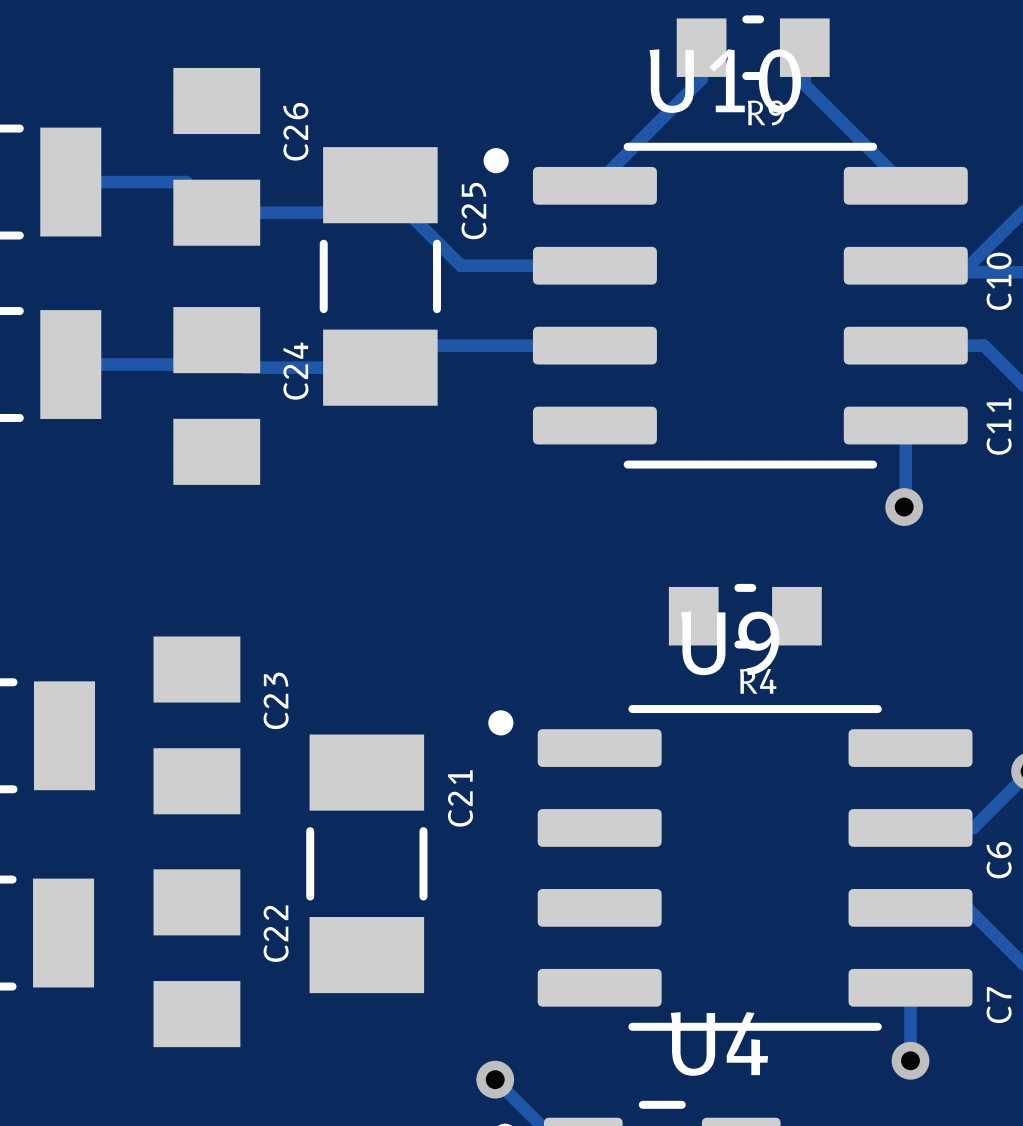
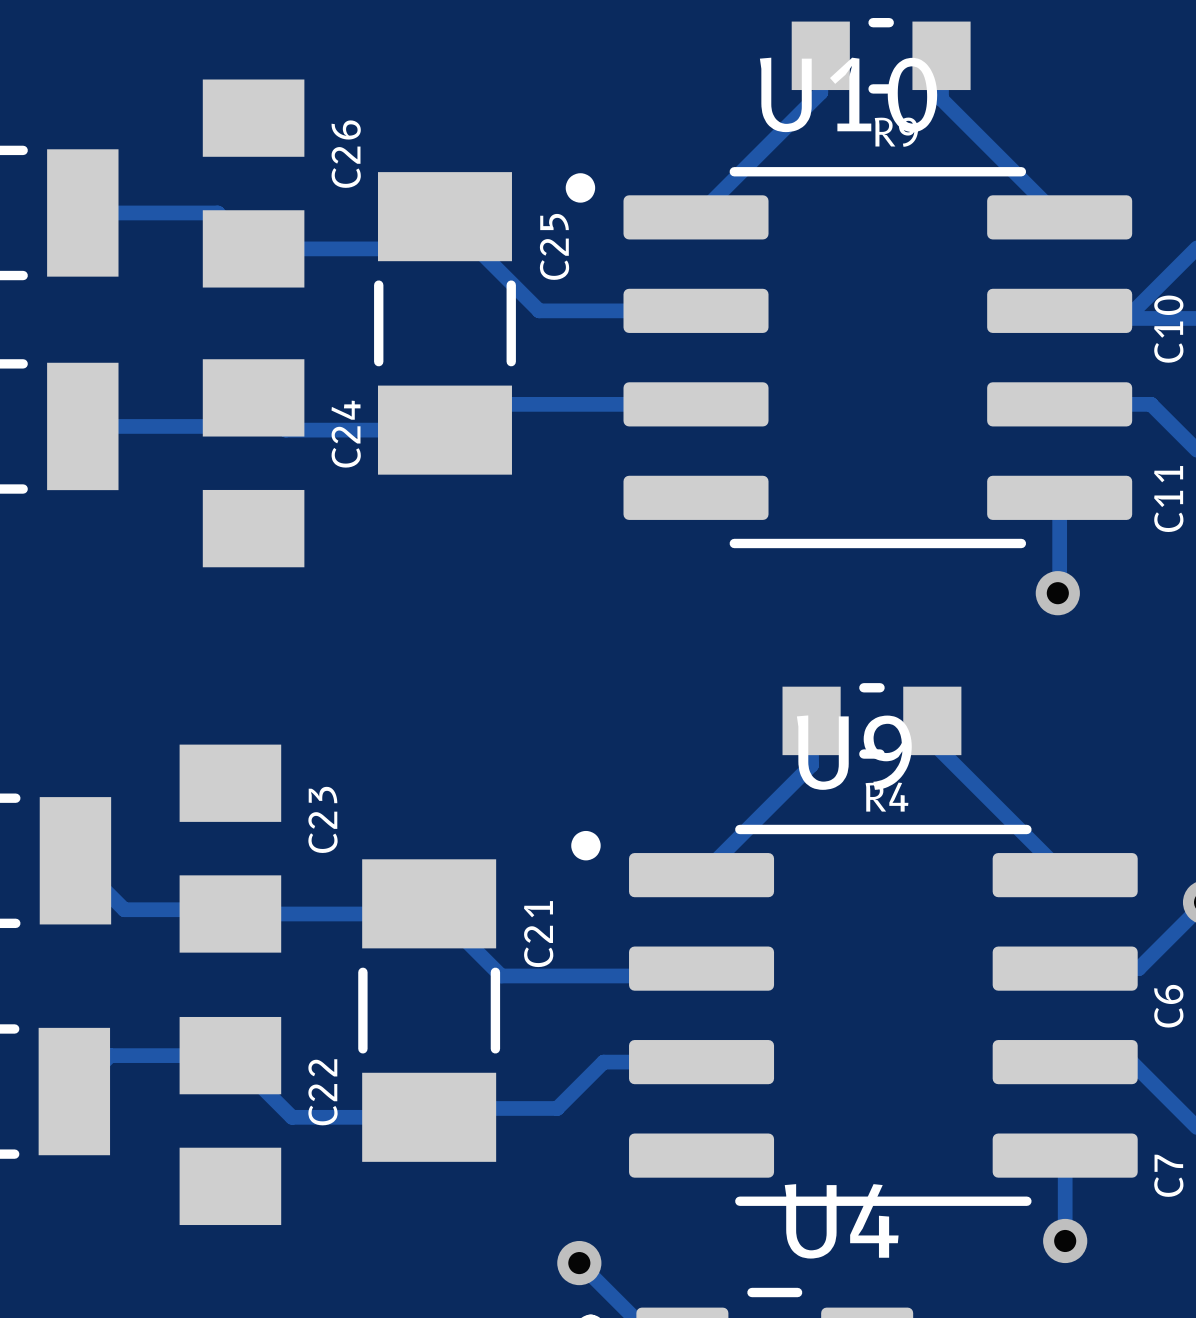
track: none -> (811, 720) (811, 765) (701, 875)
track: none -> (932, 720) (932, 742) (1065, 875)
track: none -> (75, 860) (124, 909) (226, 909) (230, 913) (419, 913) (429, 903) (501, 975) (694, 975) (701, 968)
track: none -> (701, 1062) (603, 1062) (557, 1108) (437, 1108) (429, 1117) (292, 1117) (230, 1055) (110, 1055) (74, 1091)

